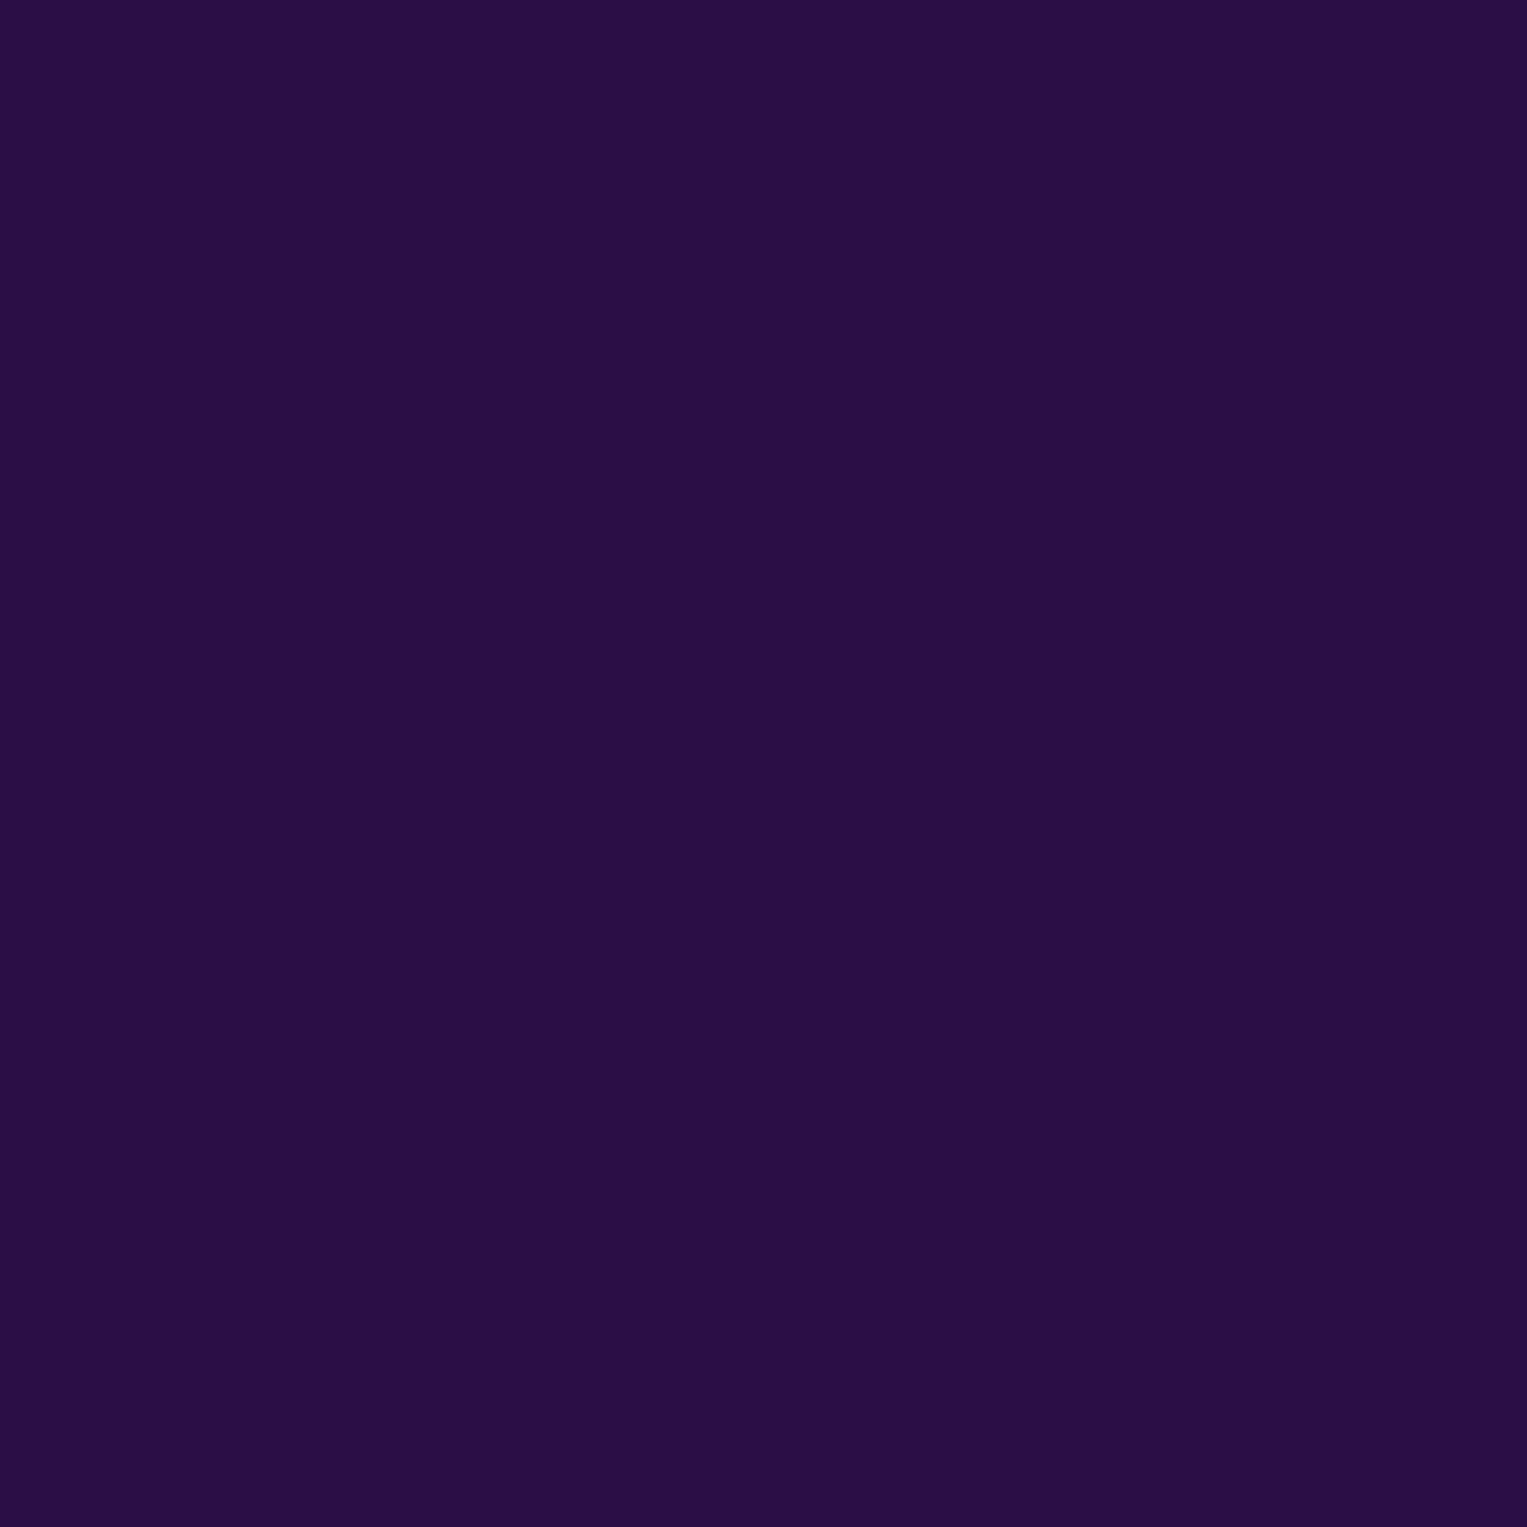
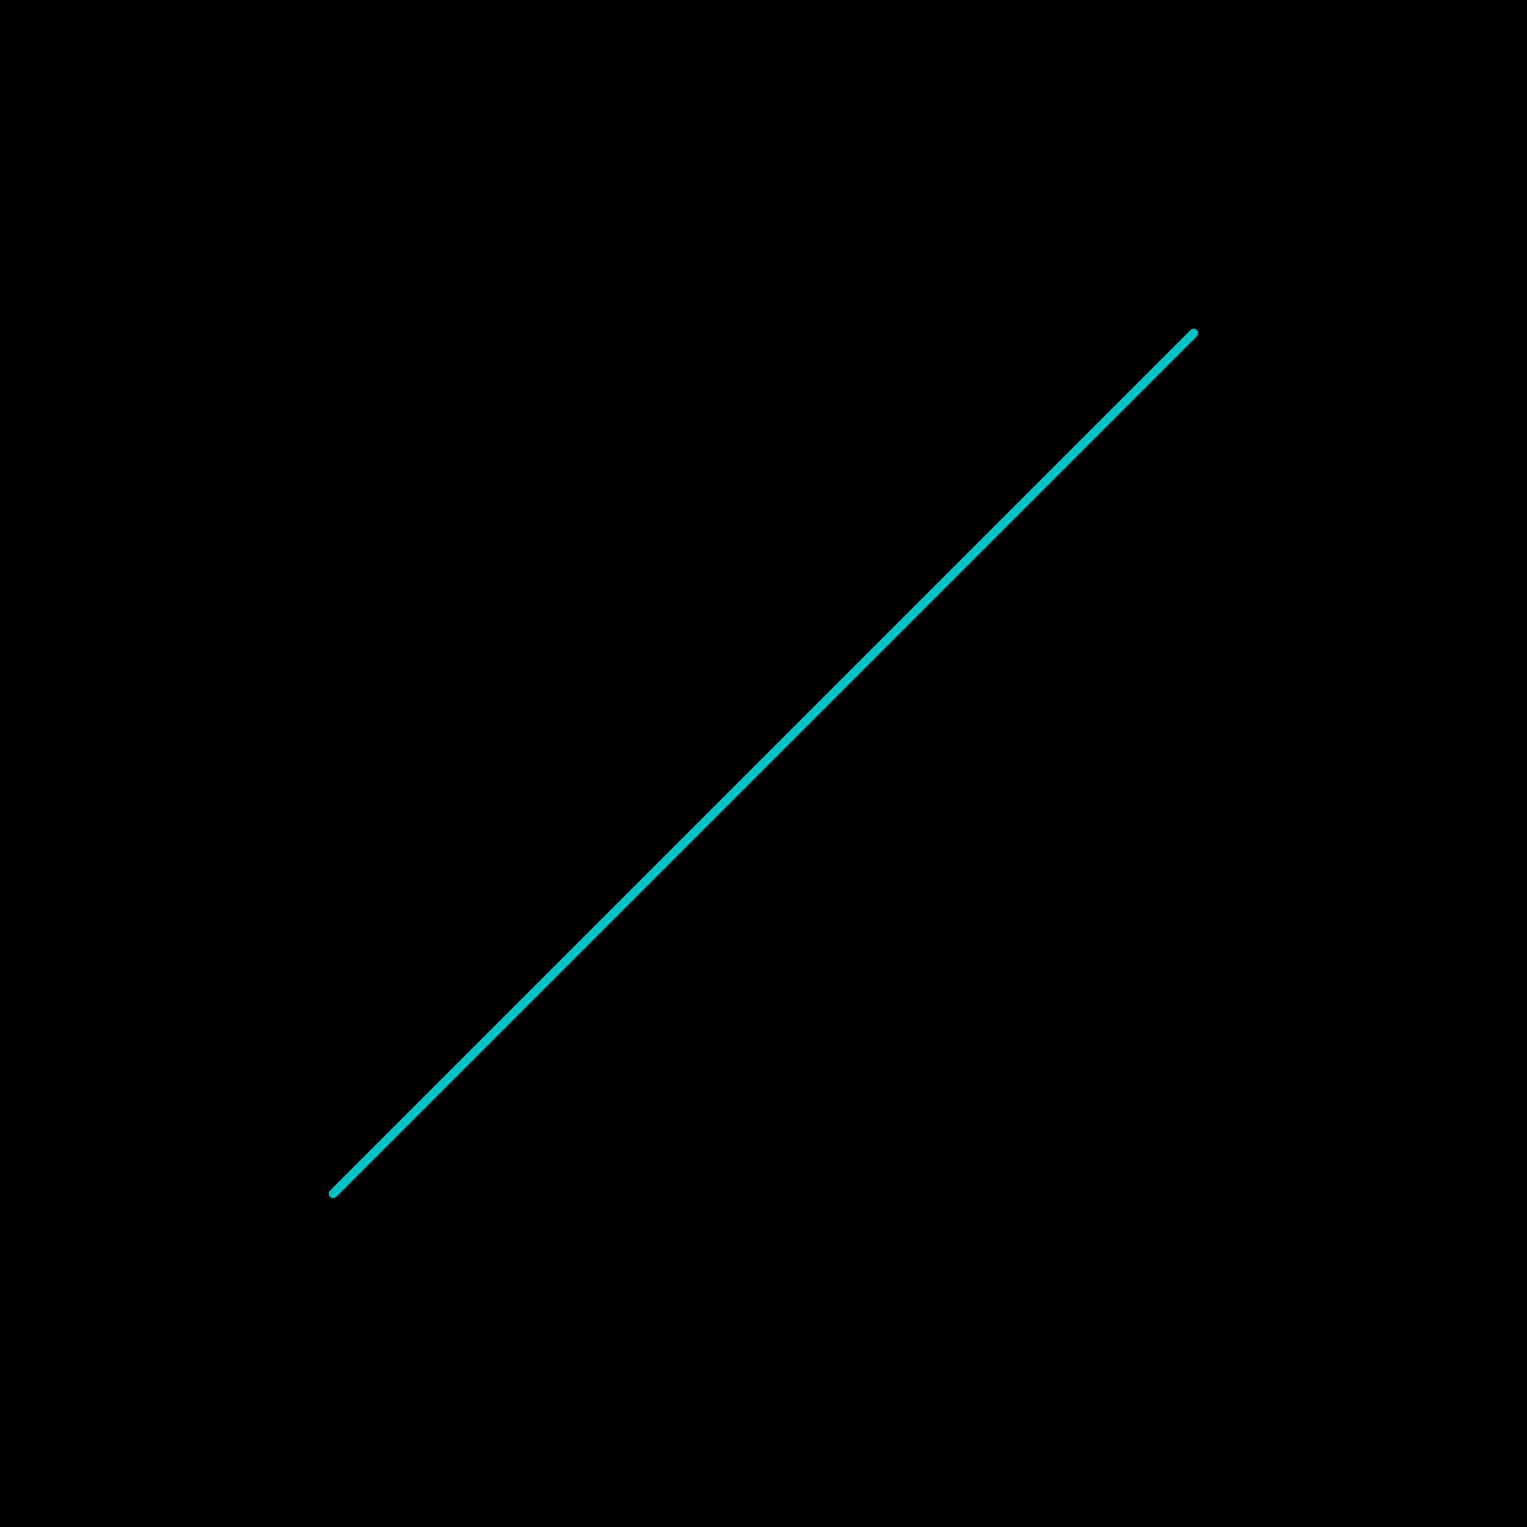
line: none -> (1193, 333) (333, 1193)

